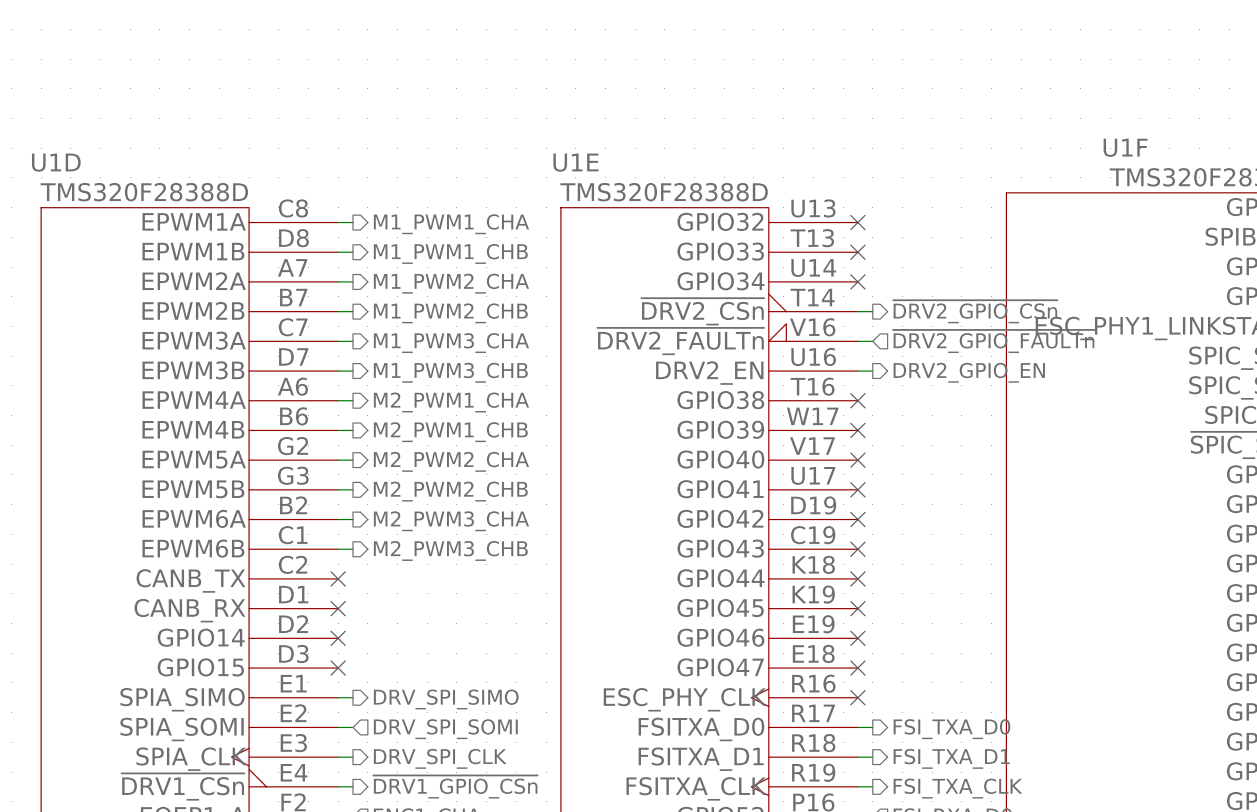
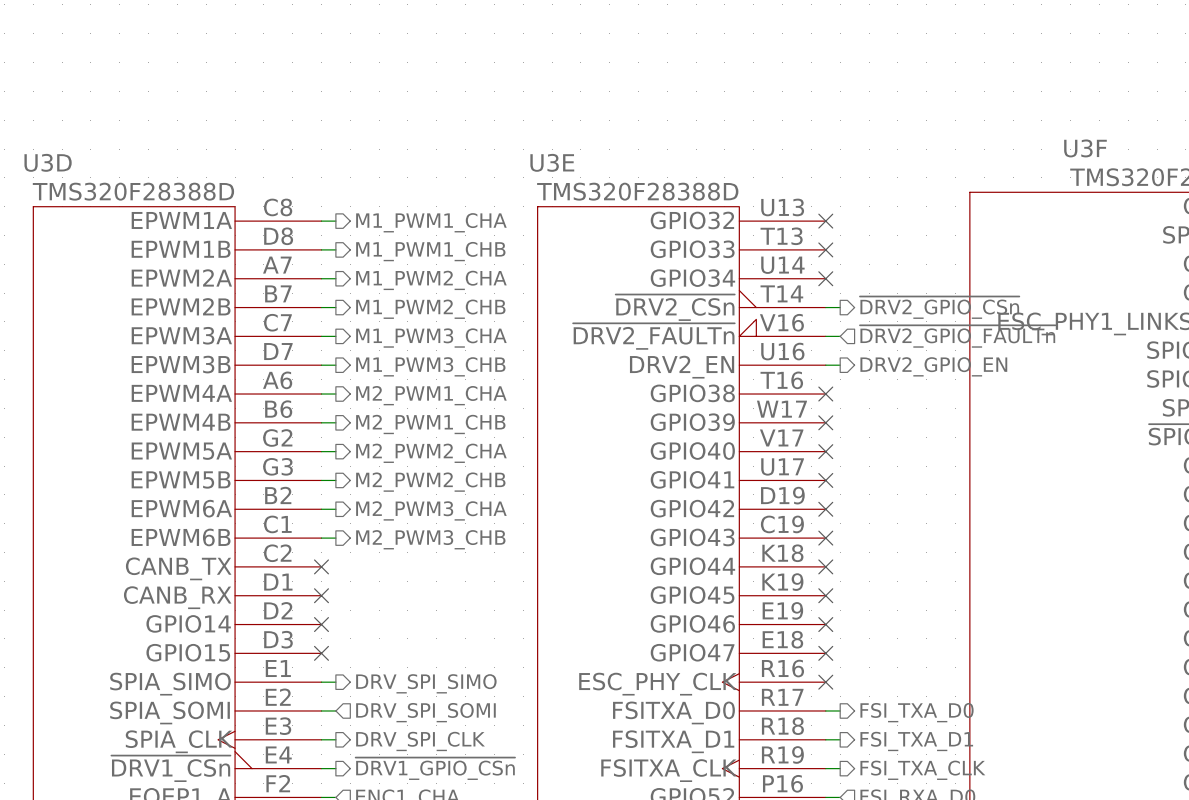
U1F name: U1F (1125, 147) -> U3F (1085, 148)
U1D name: U1D (56, 162) -> U3D (48, 162)
U1E name: U1E (576, 162) -> U3E (552, 162)

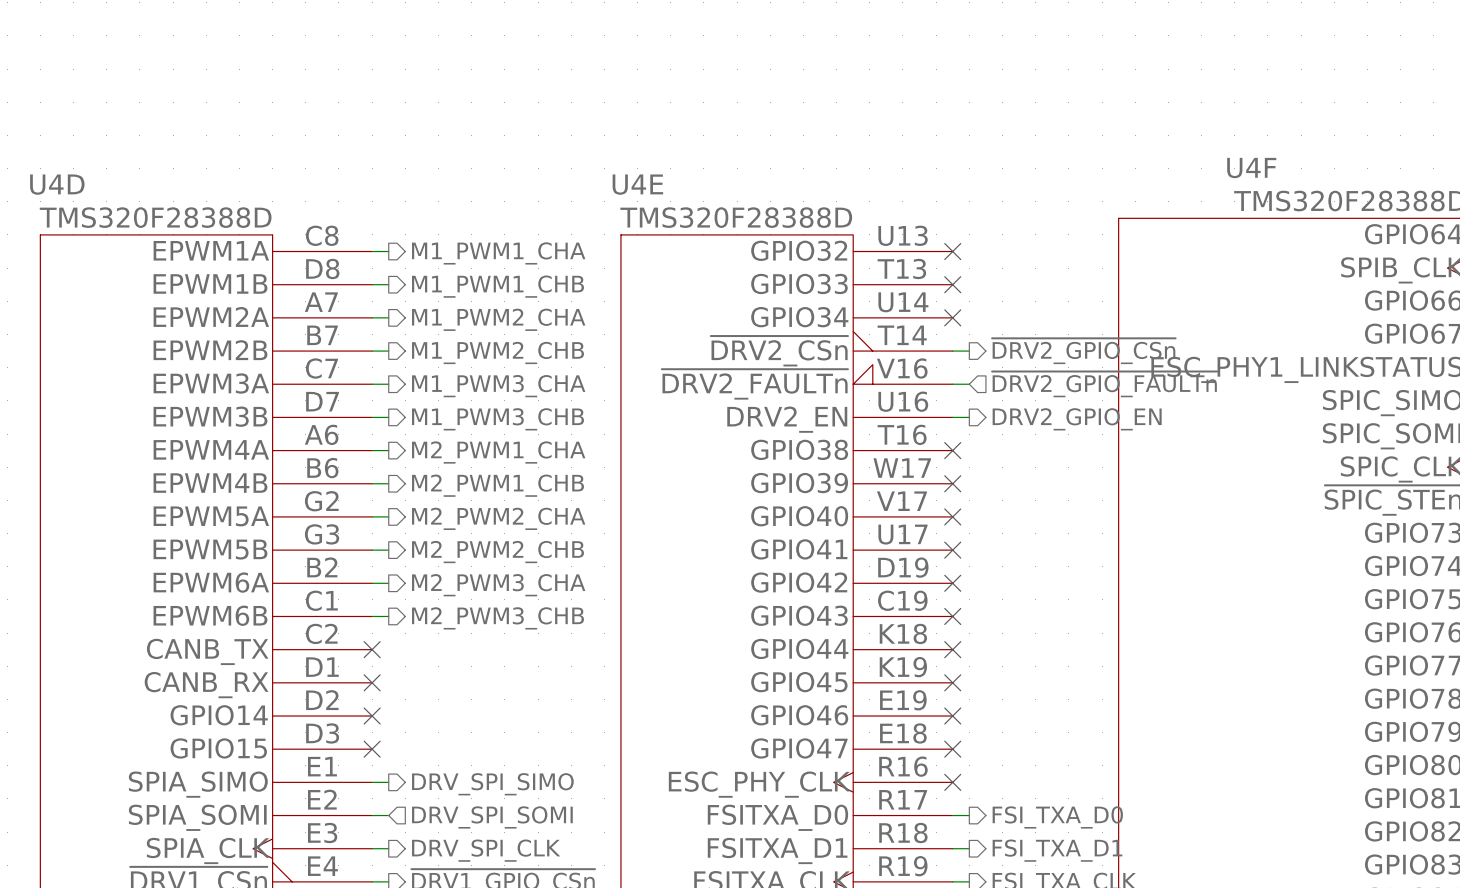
U3F name: U3F (1085, 148) -> U4F (1251, 168)
U3D name: U3D (48, 162) -> U4D (57, 184)
U3E name: U3E (552, 162) -> U4E (637, 184)

